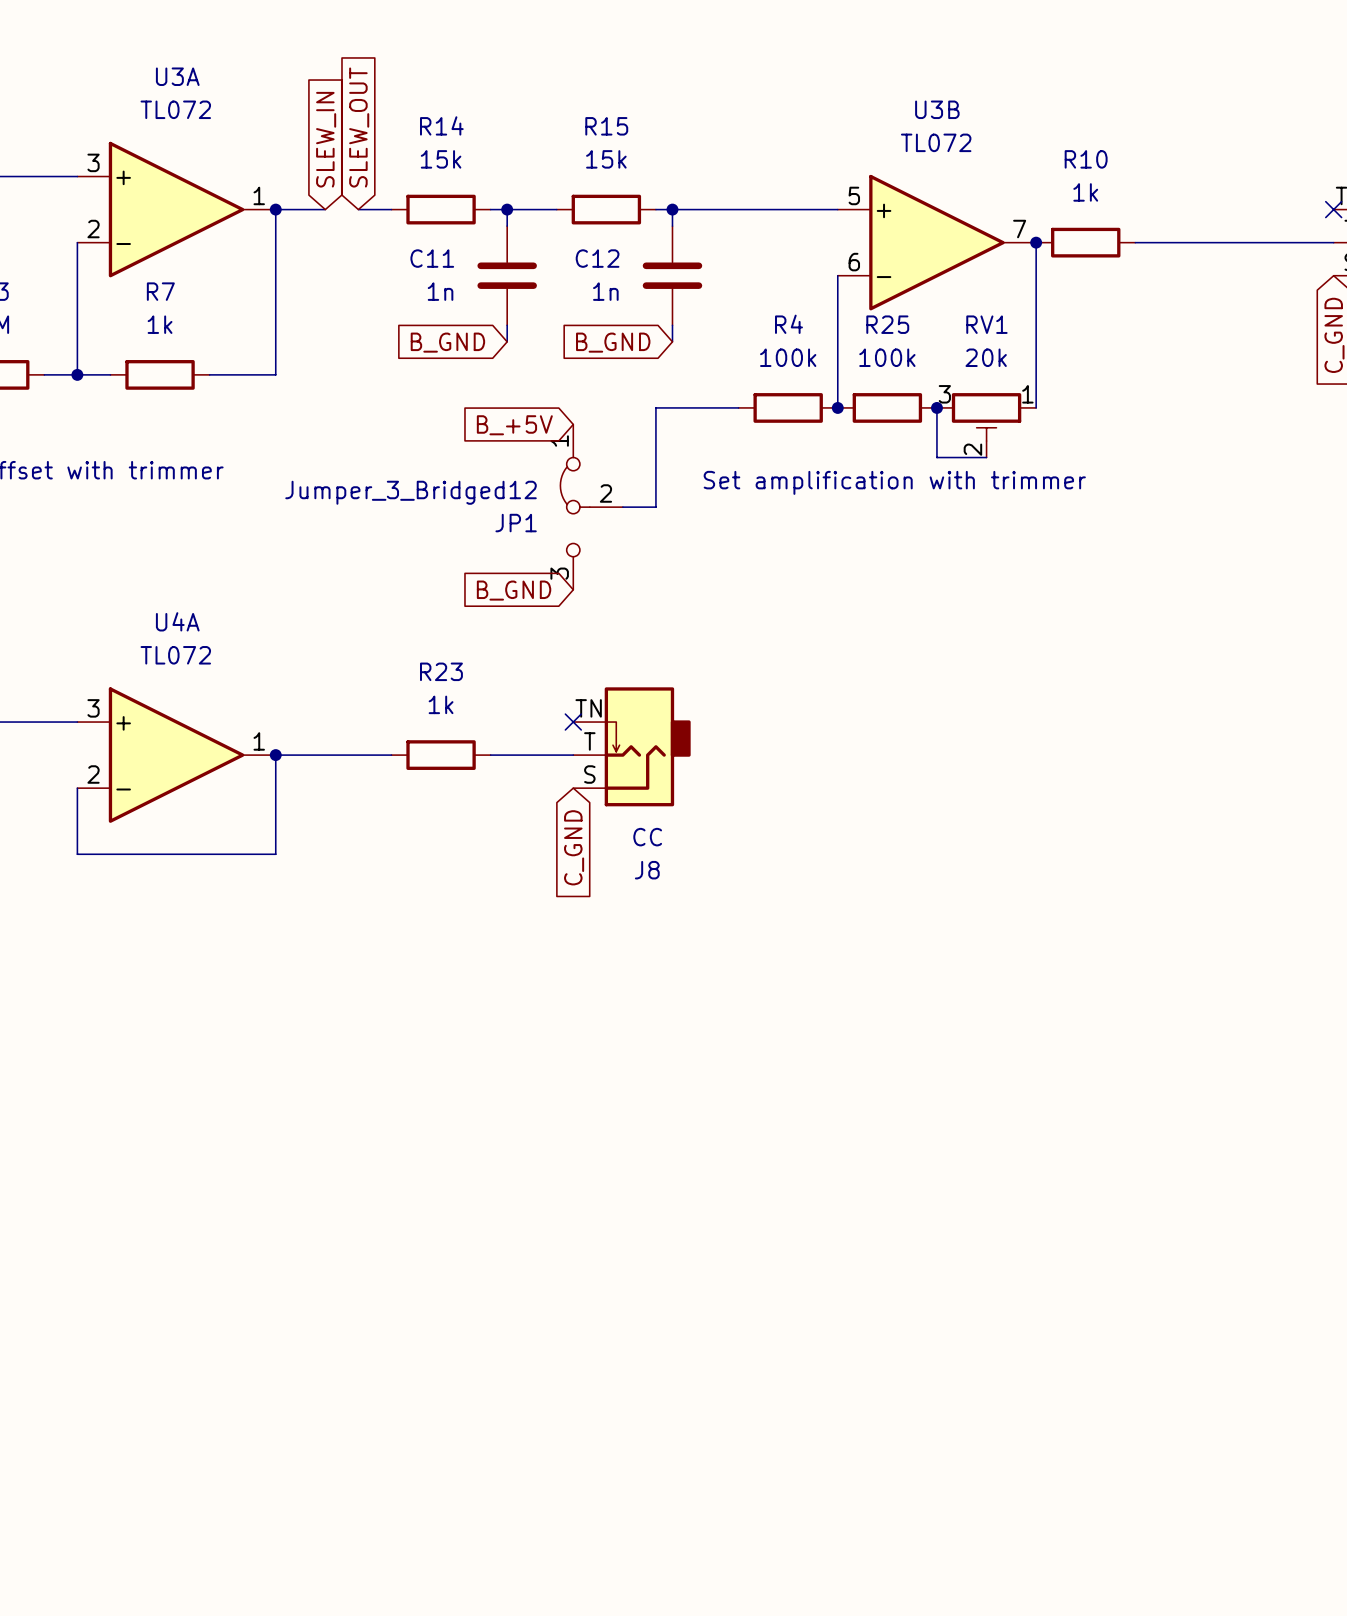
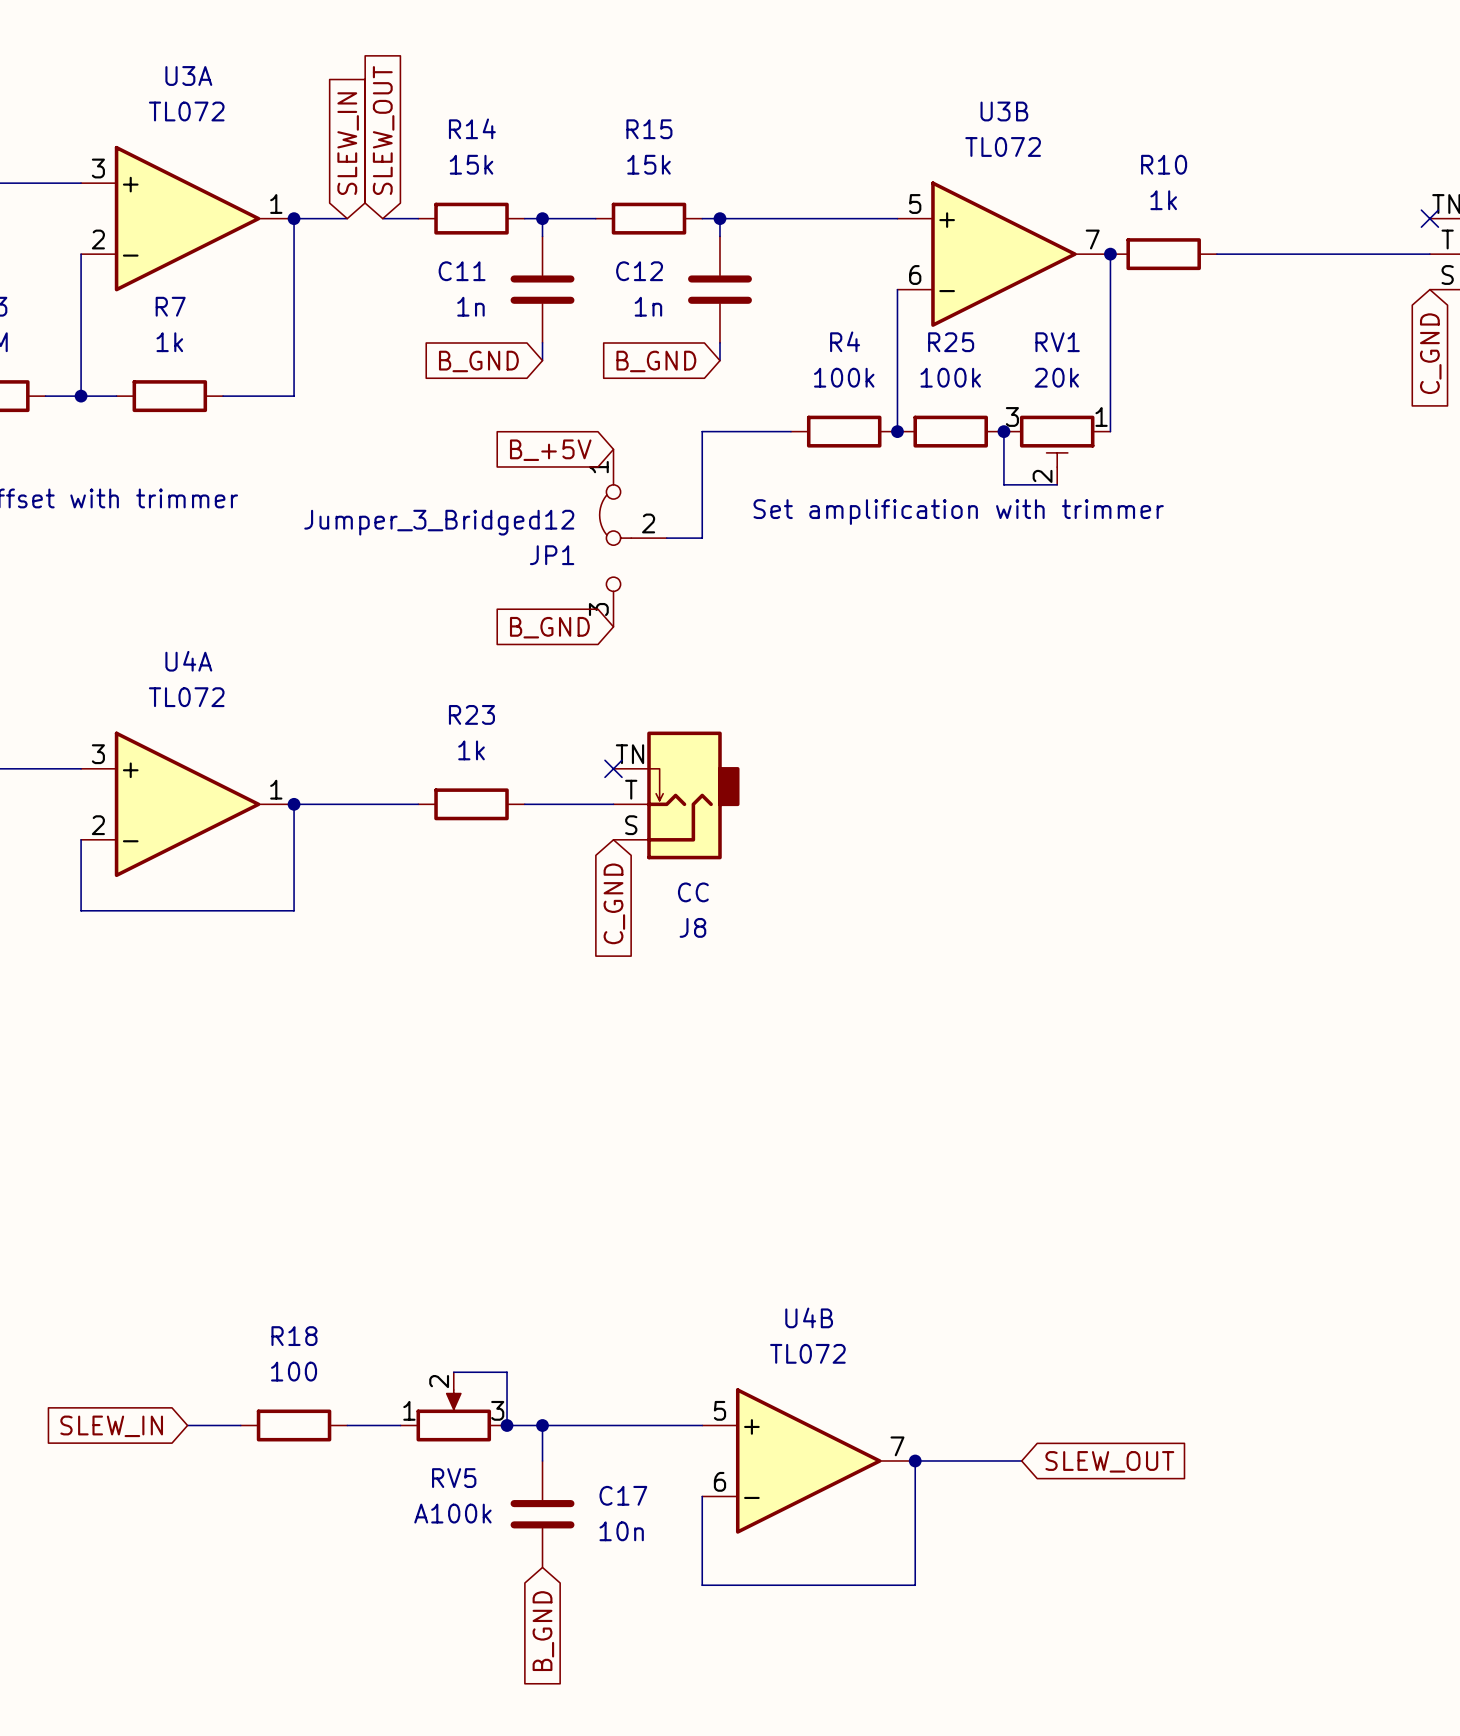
wire: none -> (453, 1372) (507, 1372) (507, 1425) (702, 1425)
RV5: none -> A100k (453, 1406)
wire: none -> (187, 1425) (240, 1425)
R18: none -> 100 (294, 1425)
wire: none -> (347, 1425) (400, 1425)
junction: none -> (507, 1425)
wire: none -> (542, 1425) (542, 1460)
junction: none -> (542, 1425)
global label: none -> SLEW_IN (111, 1426)
U4B: none -> TL072 (808, 1460)
junction: none -> (915, 1460)
wire: none -> (1021, 1460) (915, 1460) (915, 1585) (702, 1585) (702, 1496)
global label: none -> SLEW_OUT (1109, 1461)
C17: none -> 10n (542, 1514)
global label: none -> B_GND (543, 1631)

